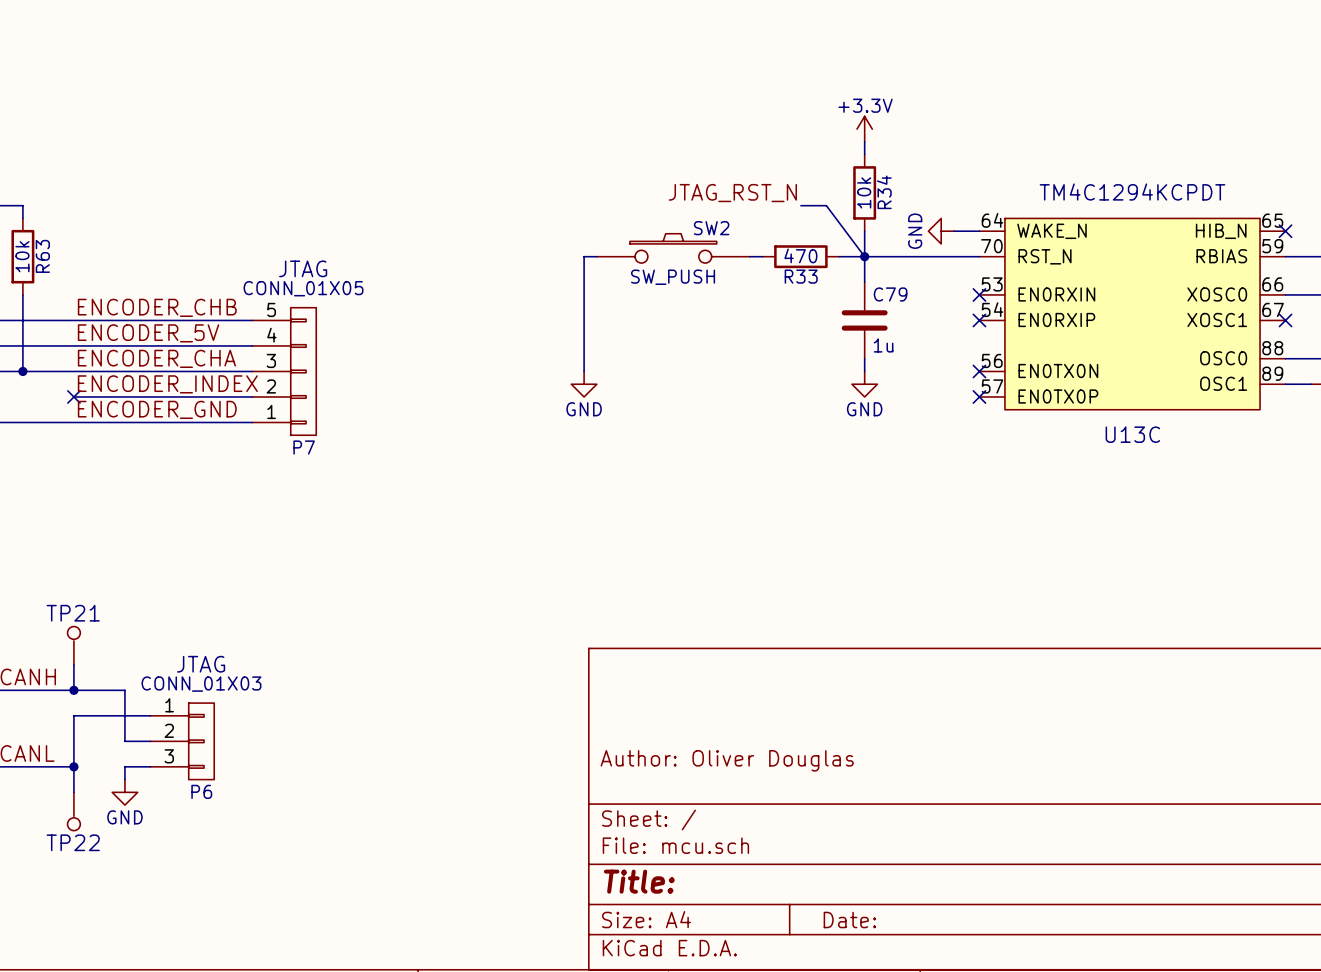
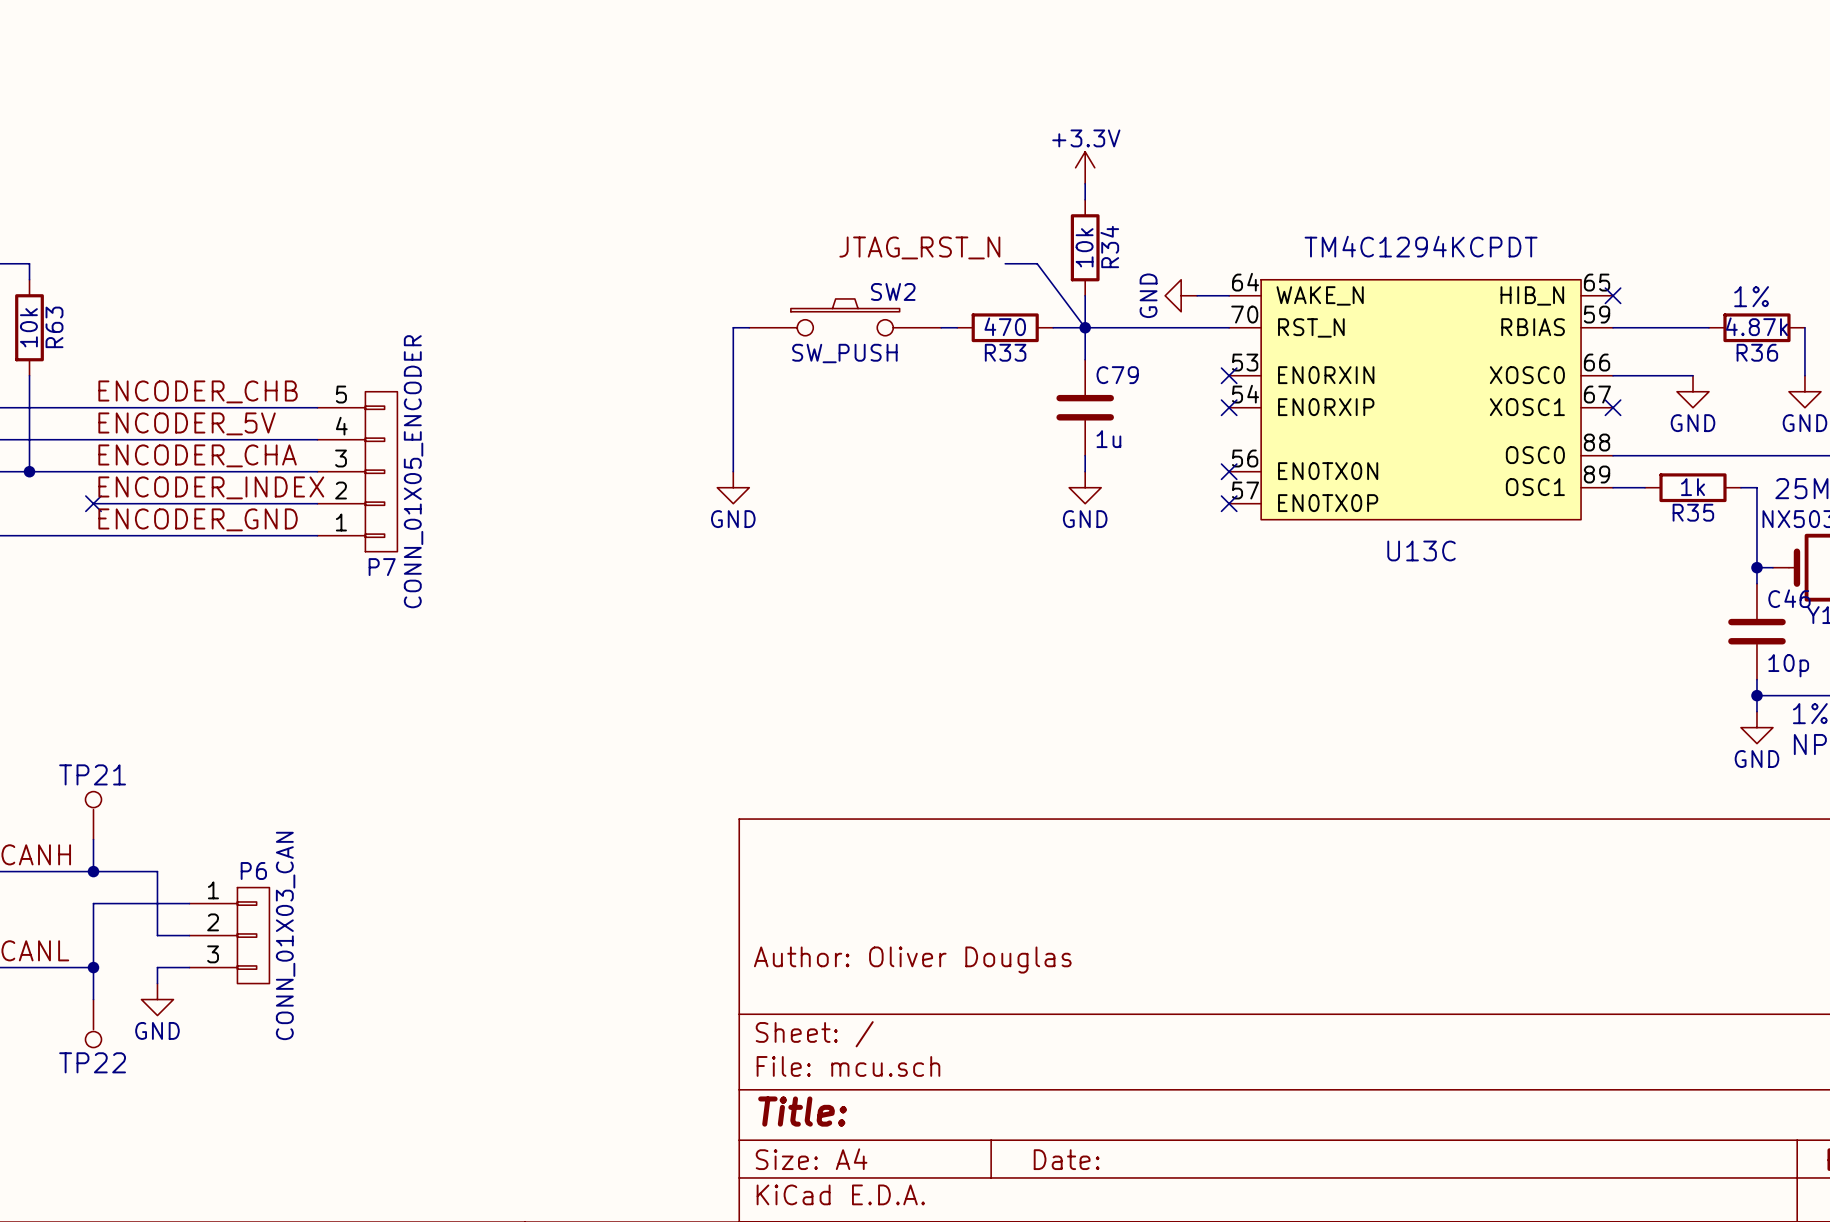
P7 text: JTAG (303, 268) -> none
P7 value: CONN_01X05 (303, 288) -> CONN_01X05_ENCODER (413, 471)
P6 text: JTAG (201, 664) -> none
P6 value: CONN_01X03 (201, 684) -> CONN_01X03_CAN (285, 935)
P6 name position: P6 (201, 791) -> P6 (253, 870)

